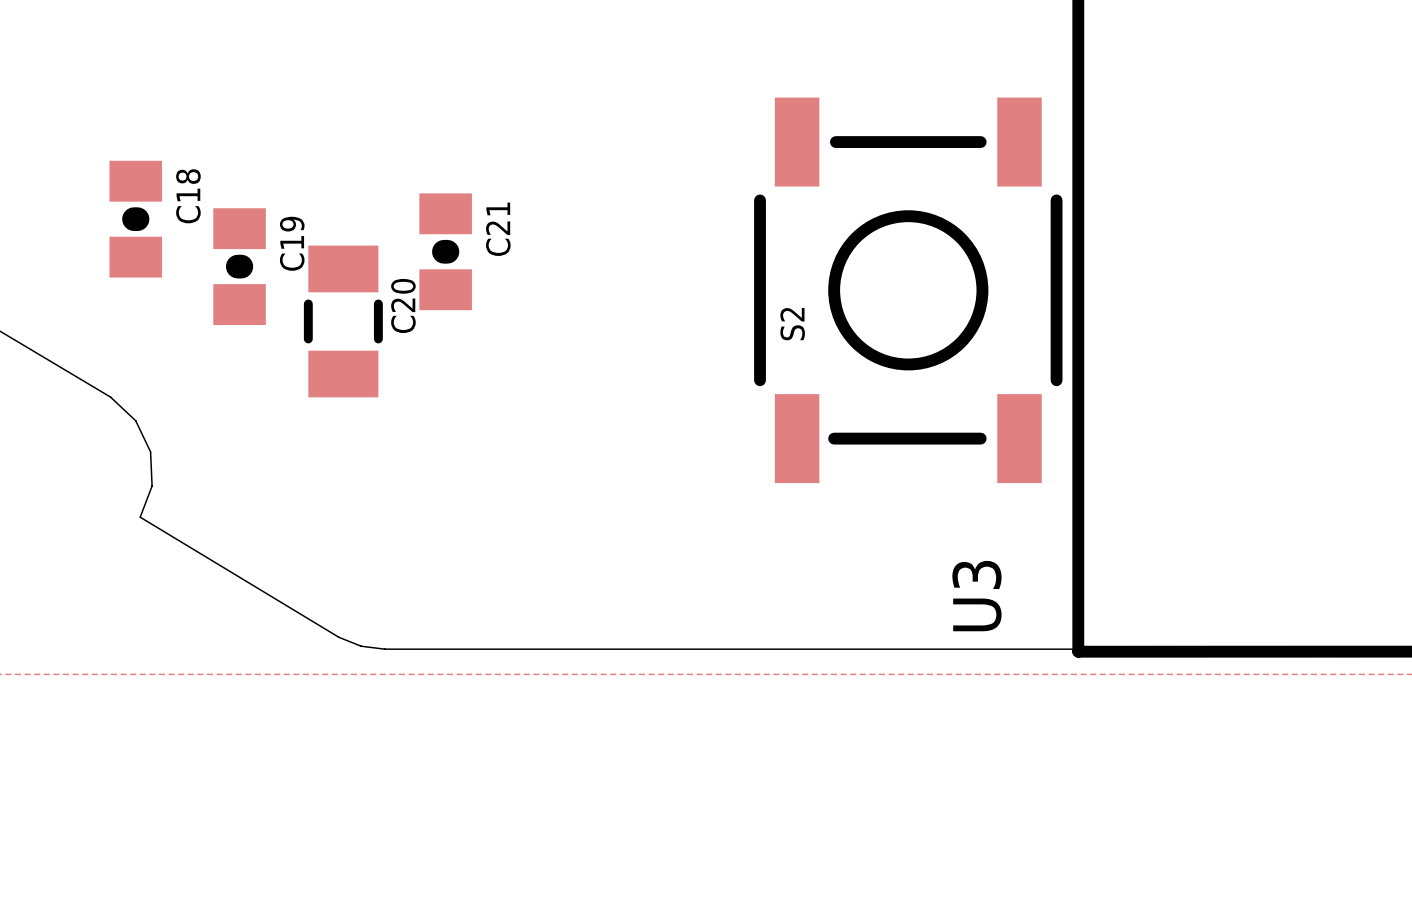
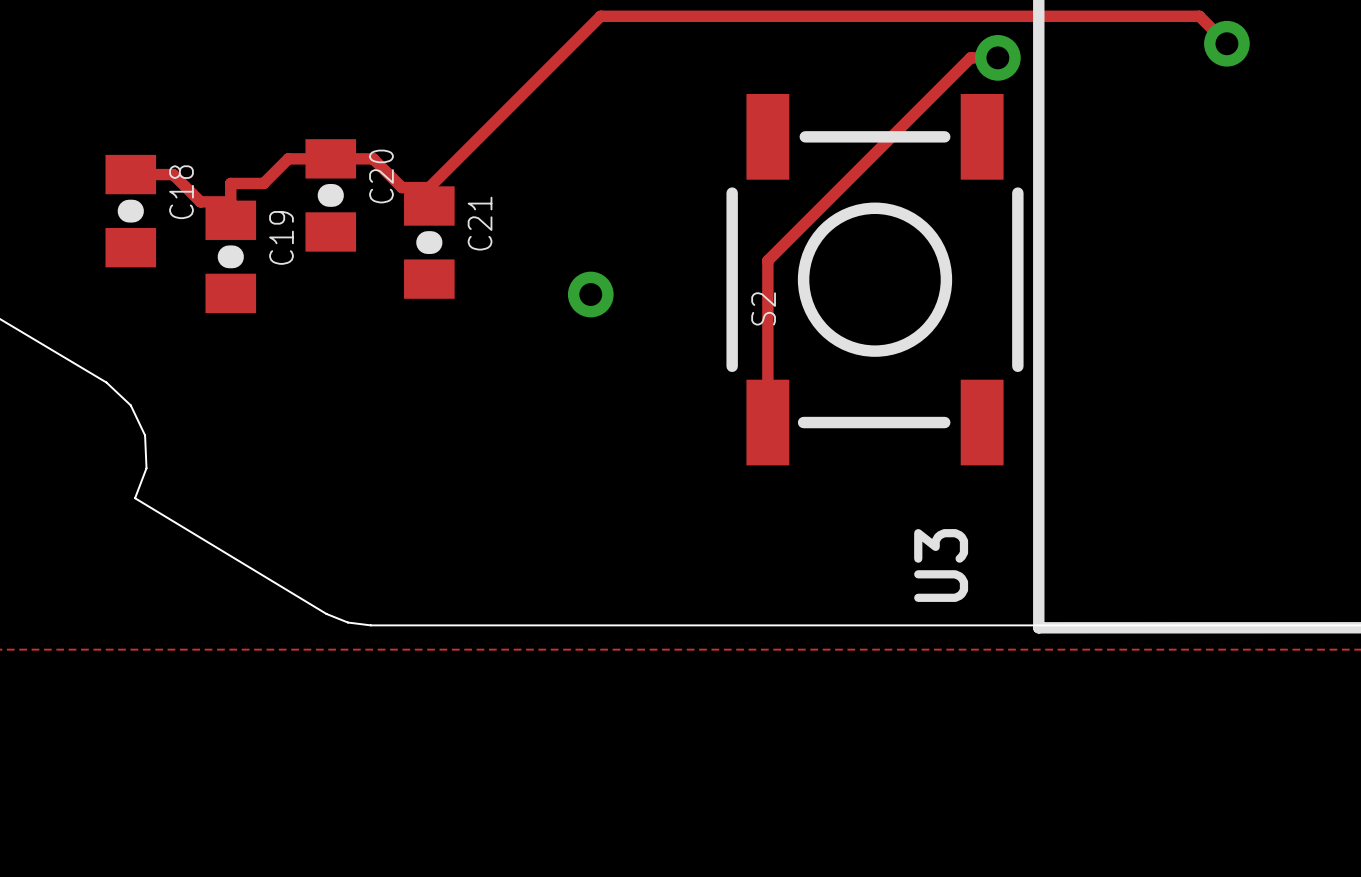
track: none -> (1226, 43) (1199, 16) (600, 16) (429, 187)
via: none -> (1226, 43)
track: none -> (997, 57) (970, 57) (767, 260) (767, 422)
via: none -> (997, 57)
track: none -> (130, 174) (173, 174) (200, 201) (230, 201)
track: none -> (429, 187) (401, 187) (373, 158) (288, 158) (263, 183) (230, 183) (230, 220)
C20 footprint: [303, 245, 383, 398] -> [305, 139, 357, 252]
via: none -> (590, 294)

